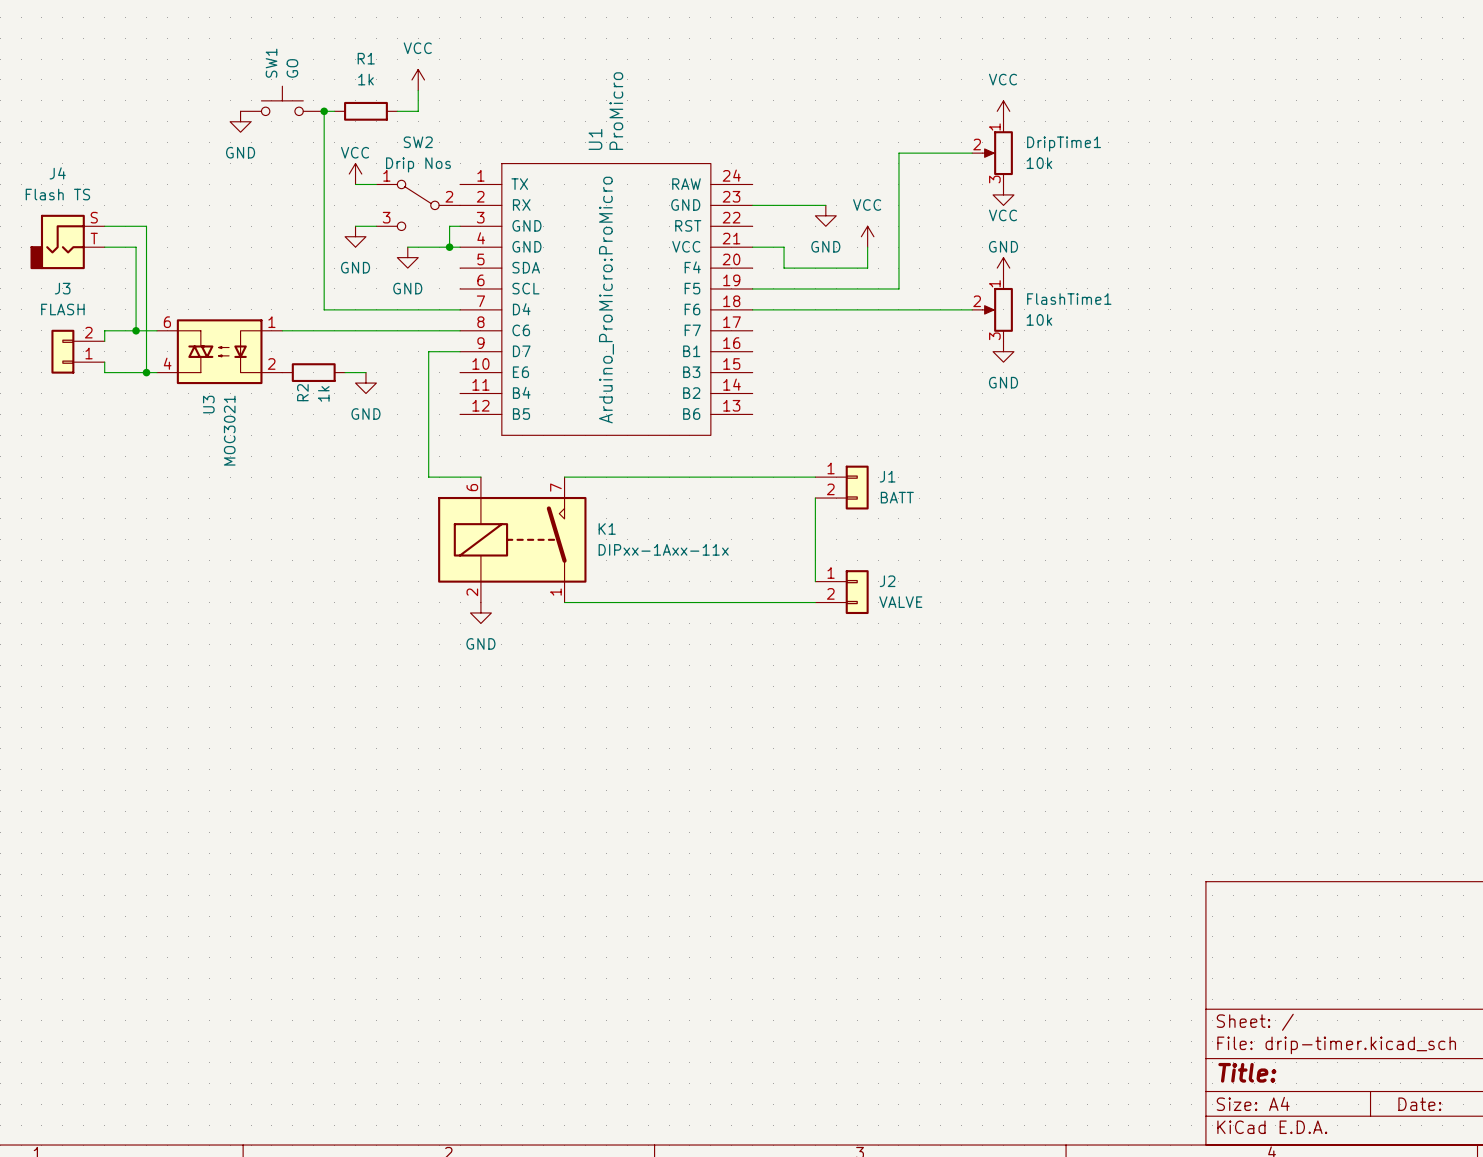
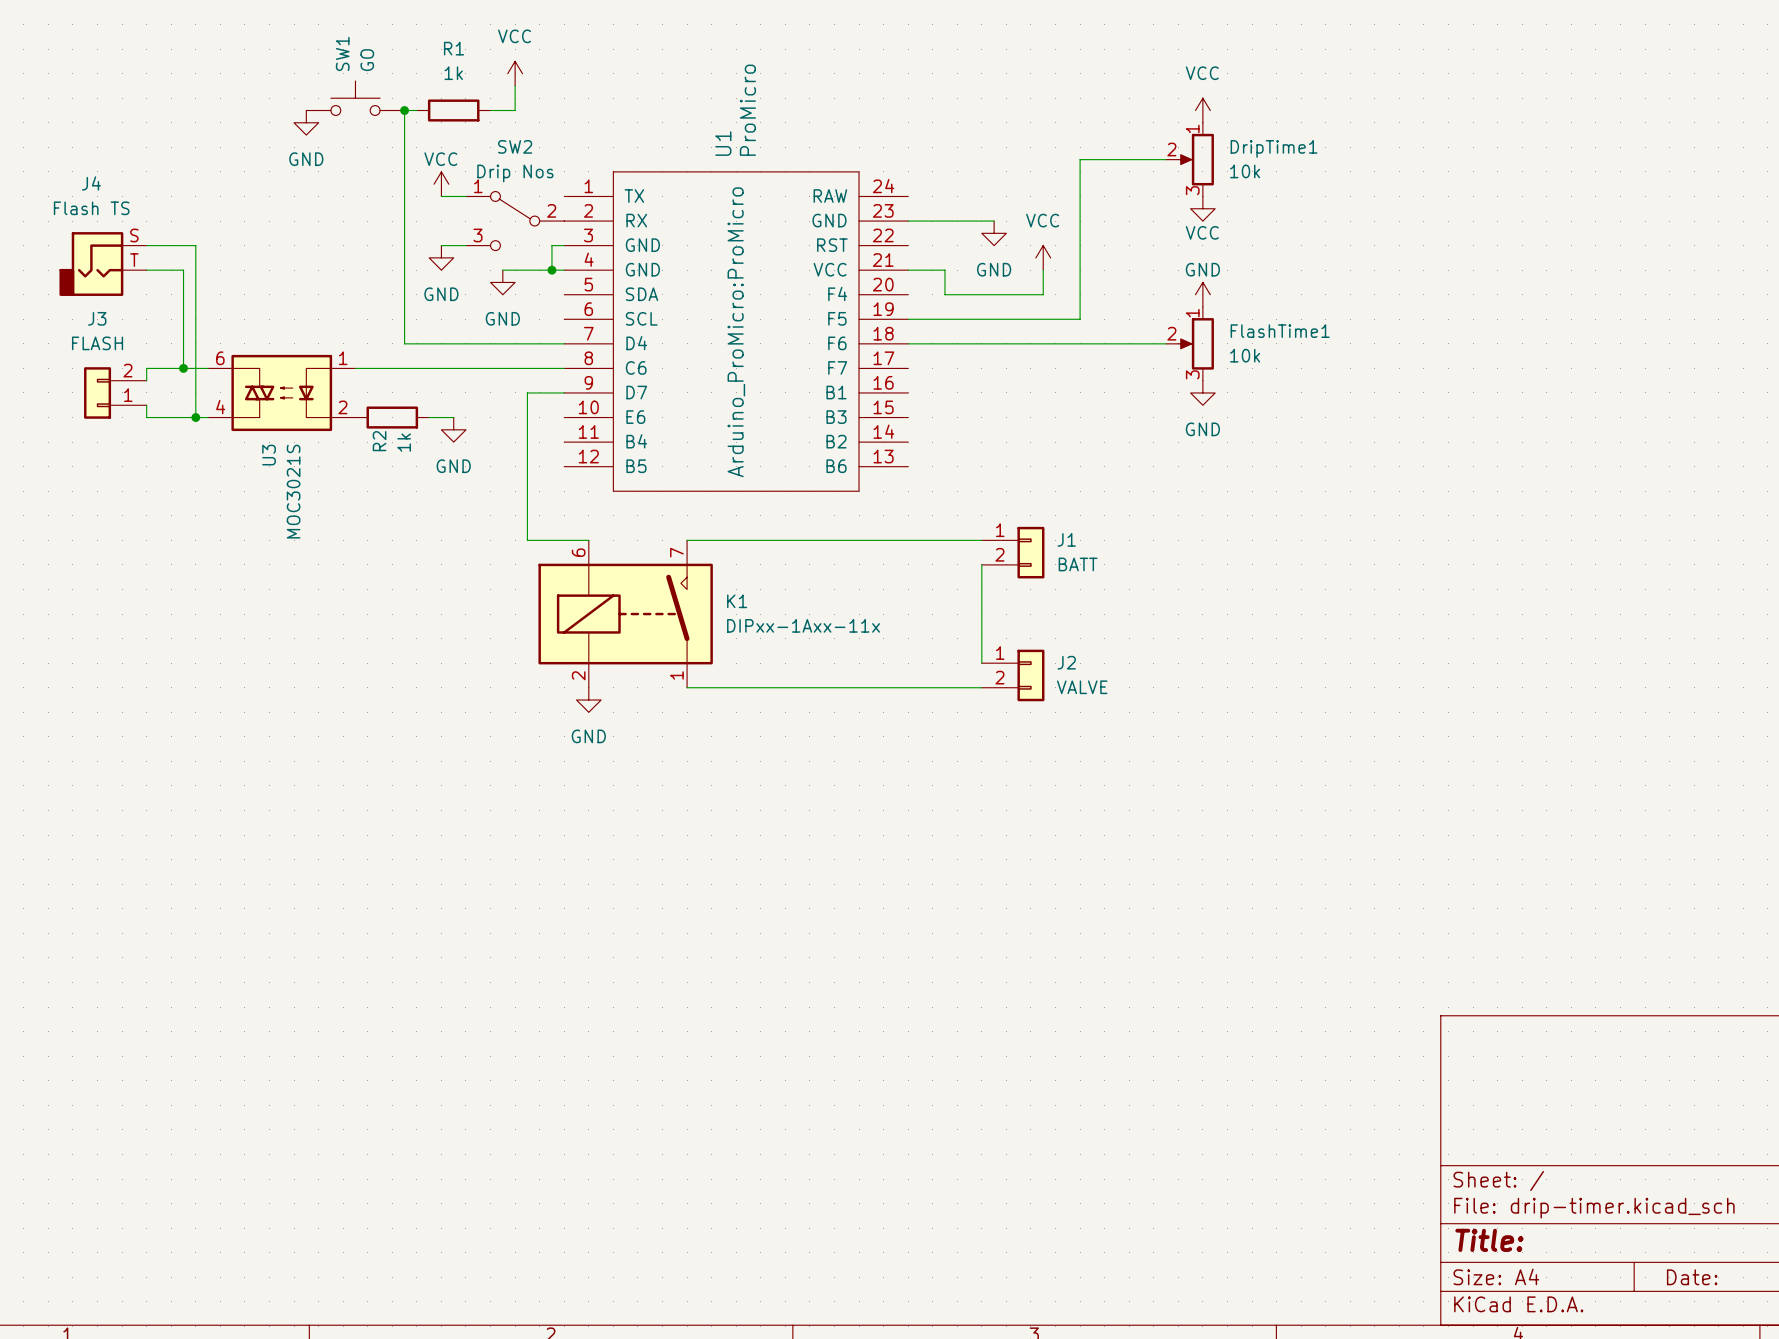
U3 value: MOC3021 (229, 430) -> MOC3021S (293, 491)

